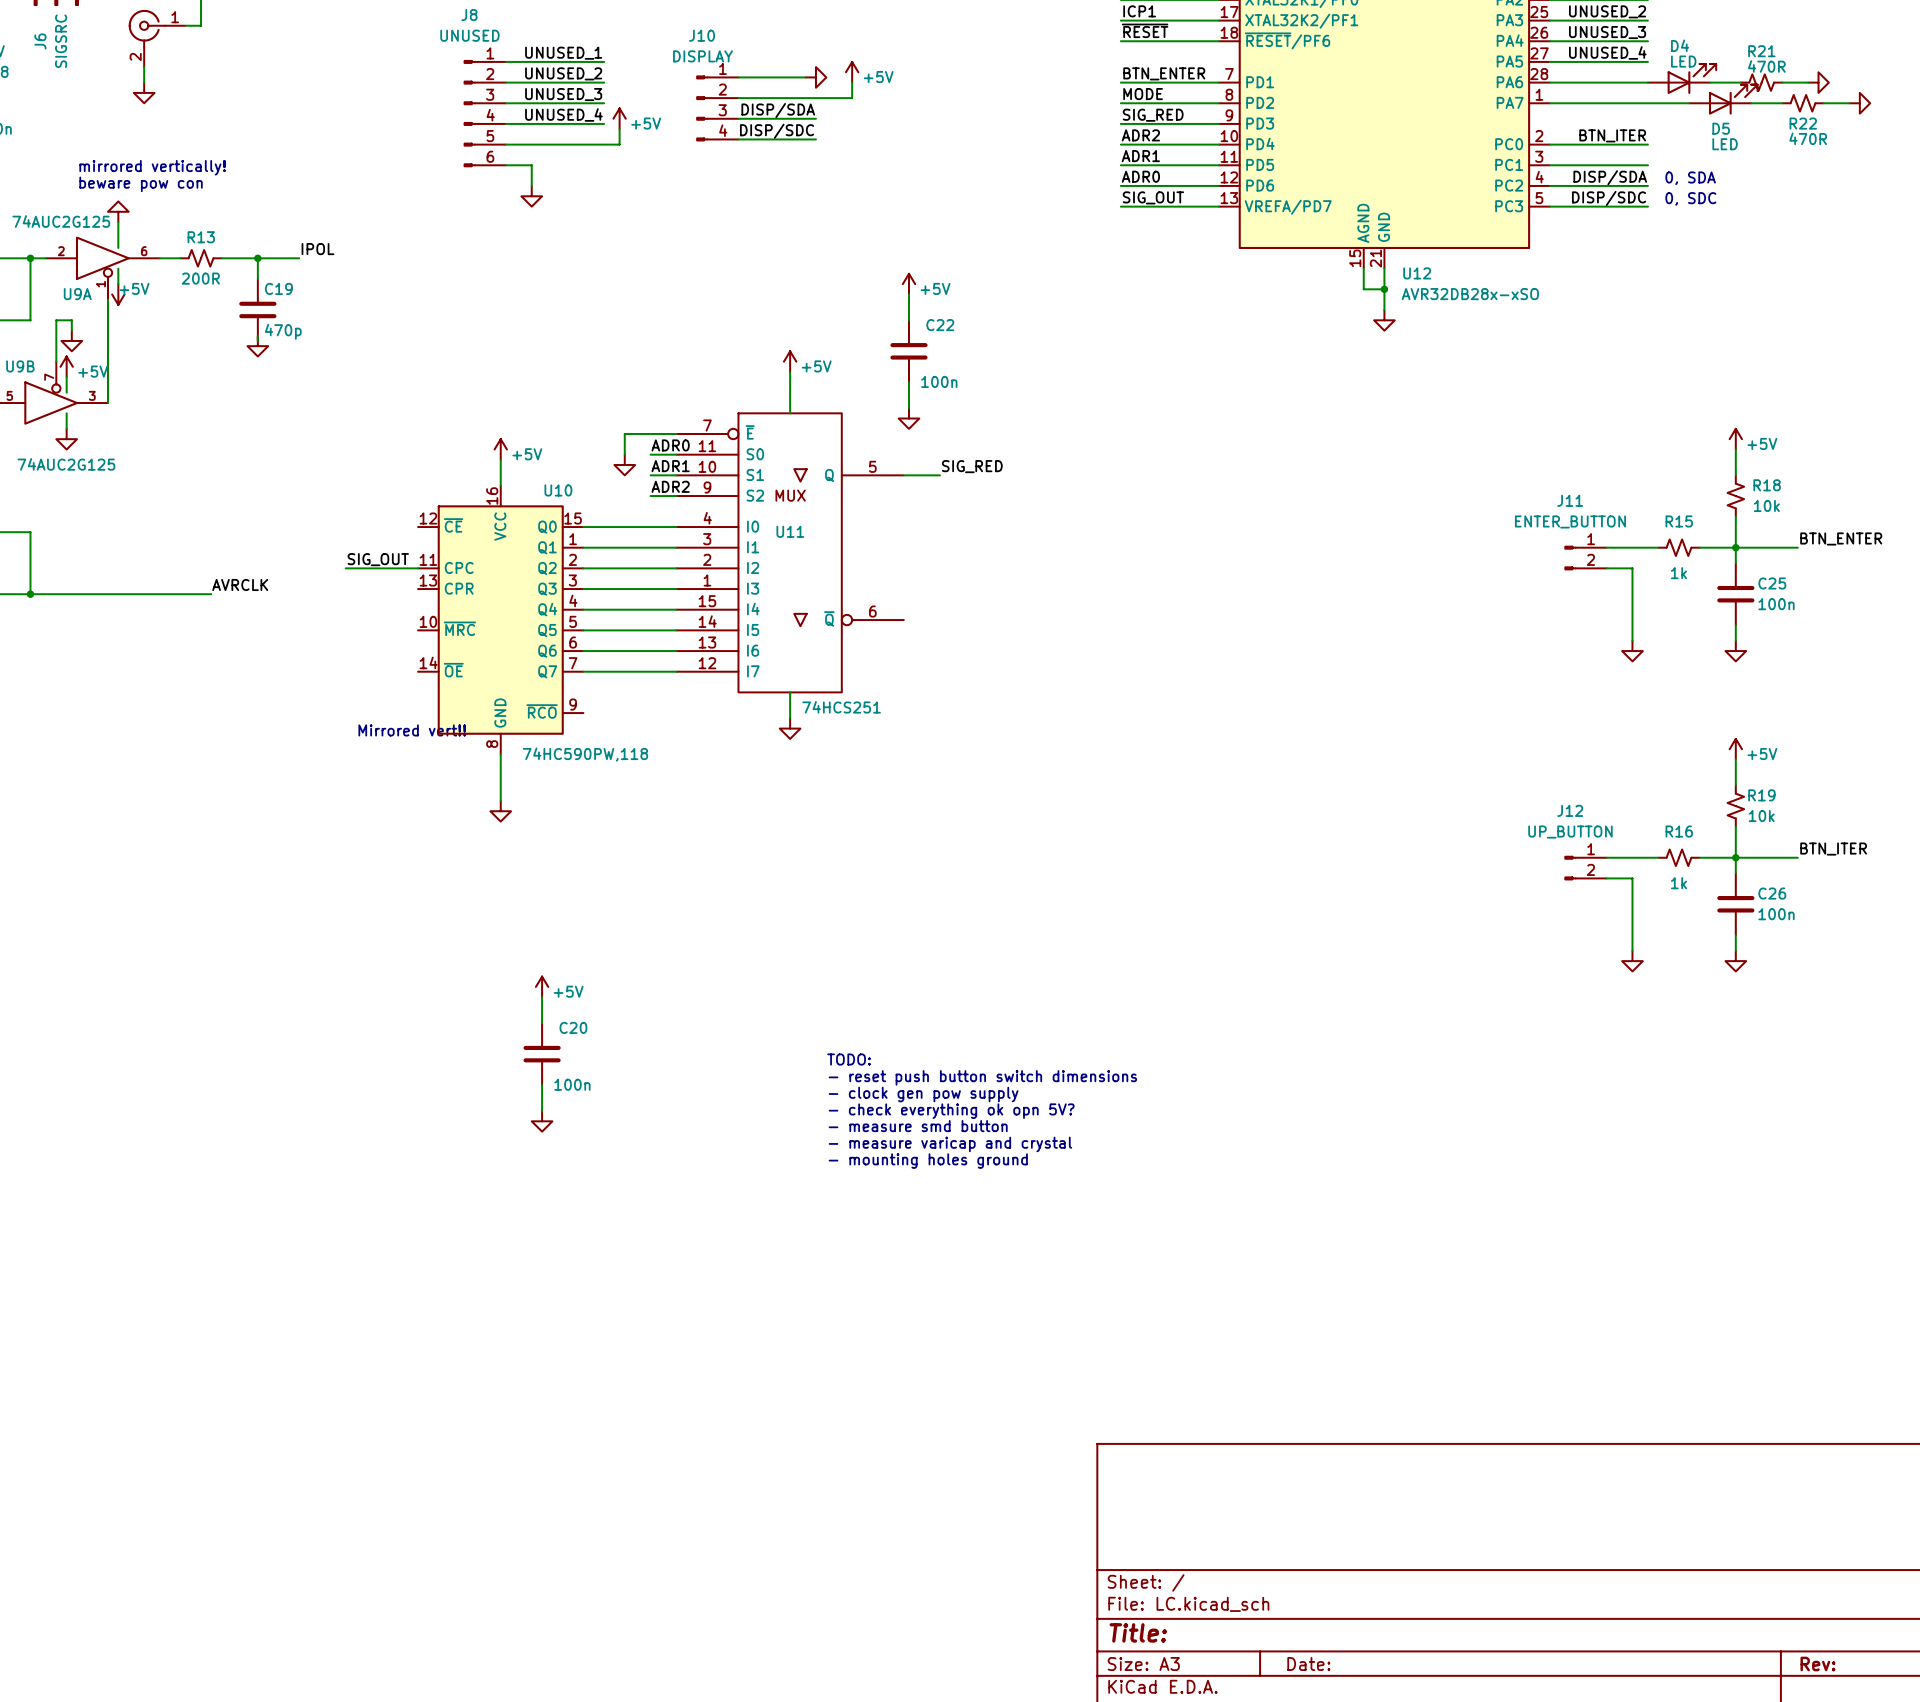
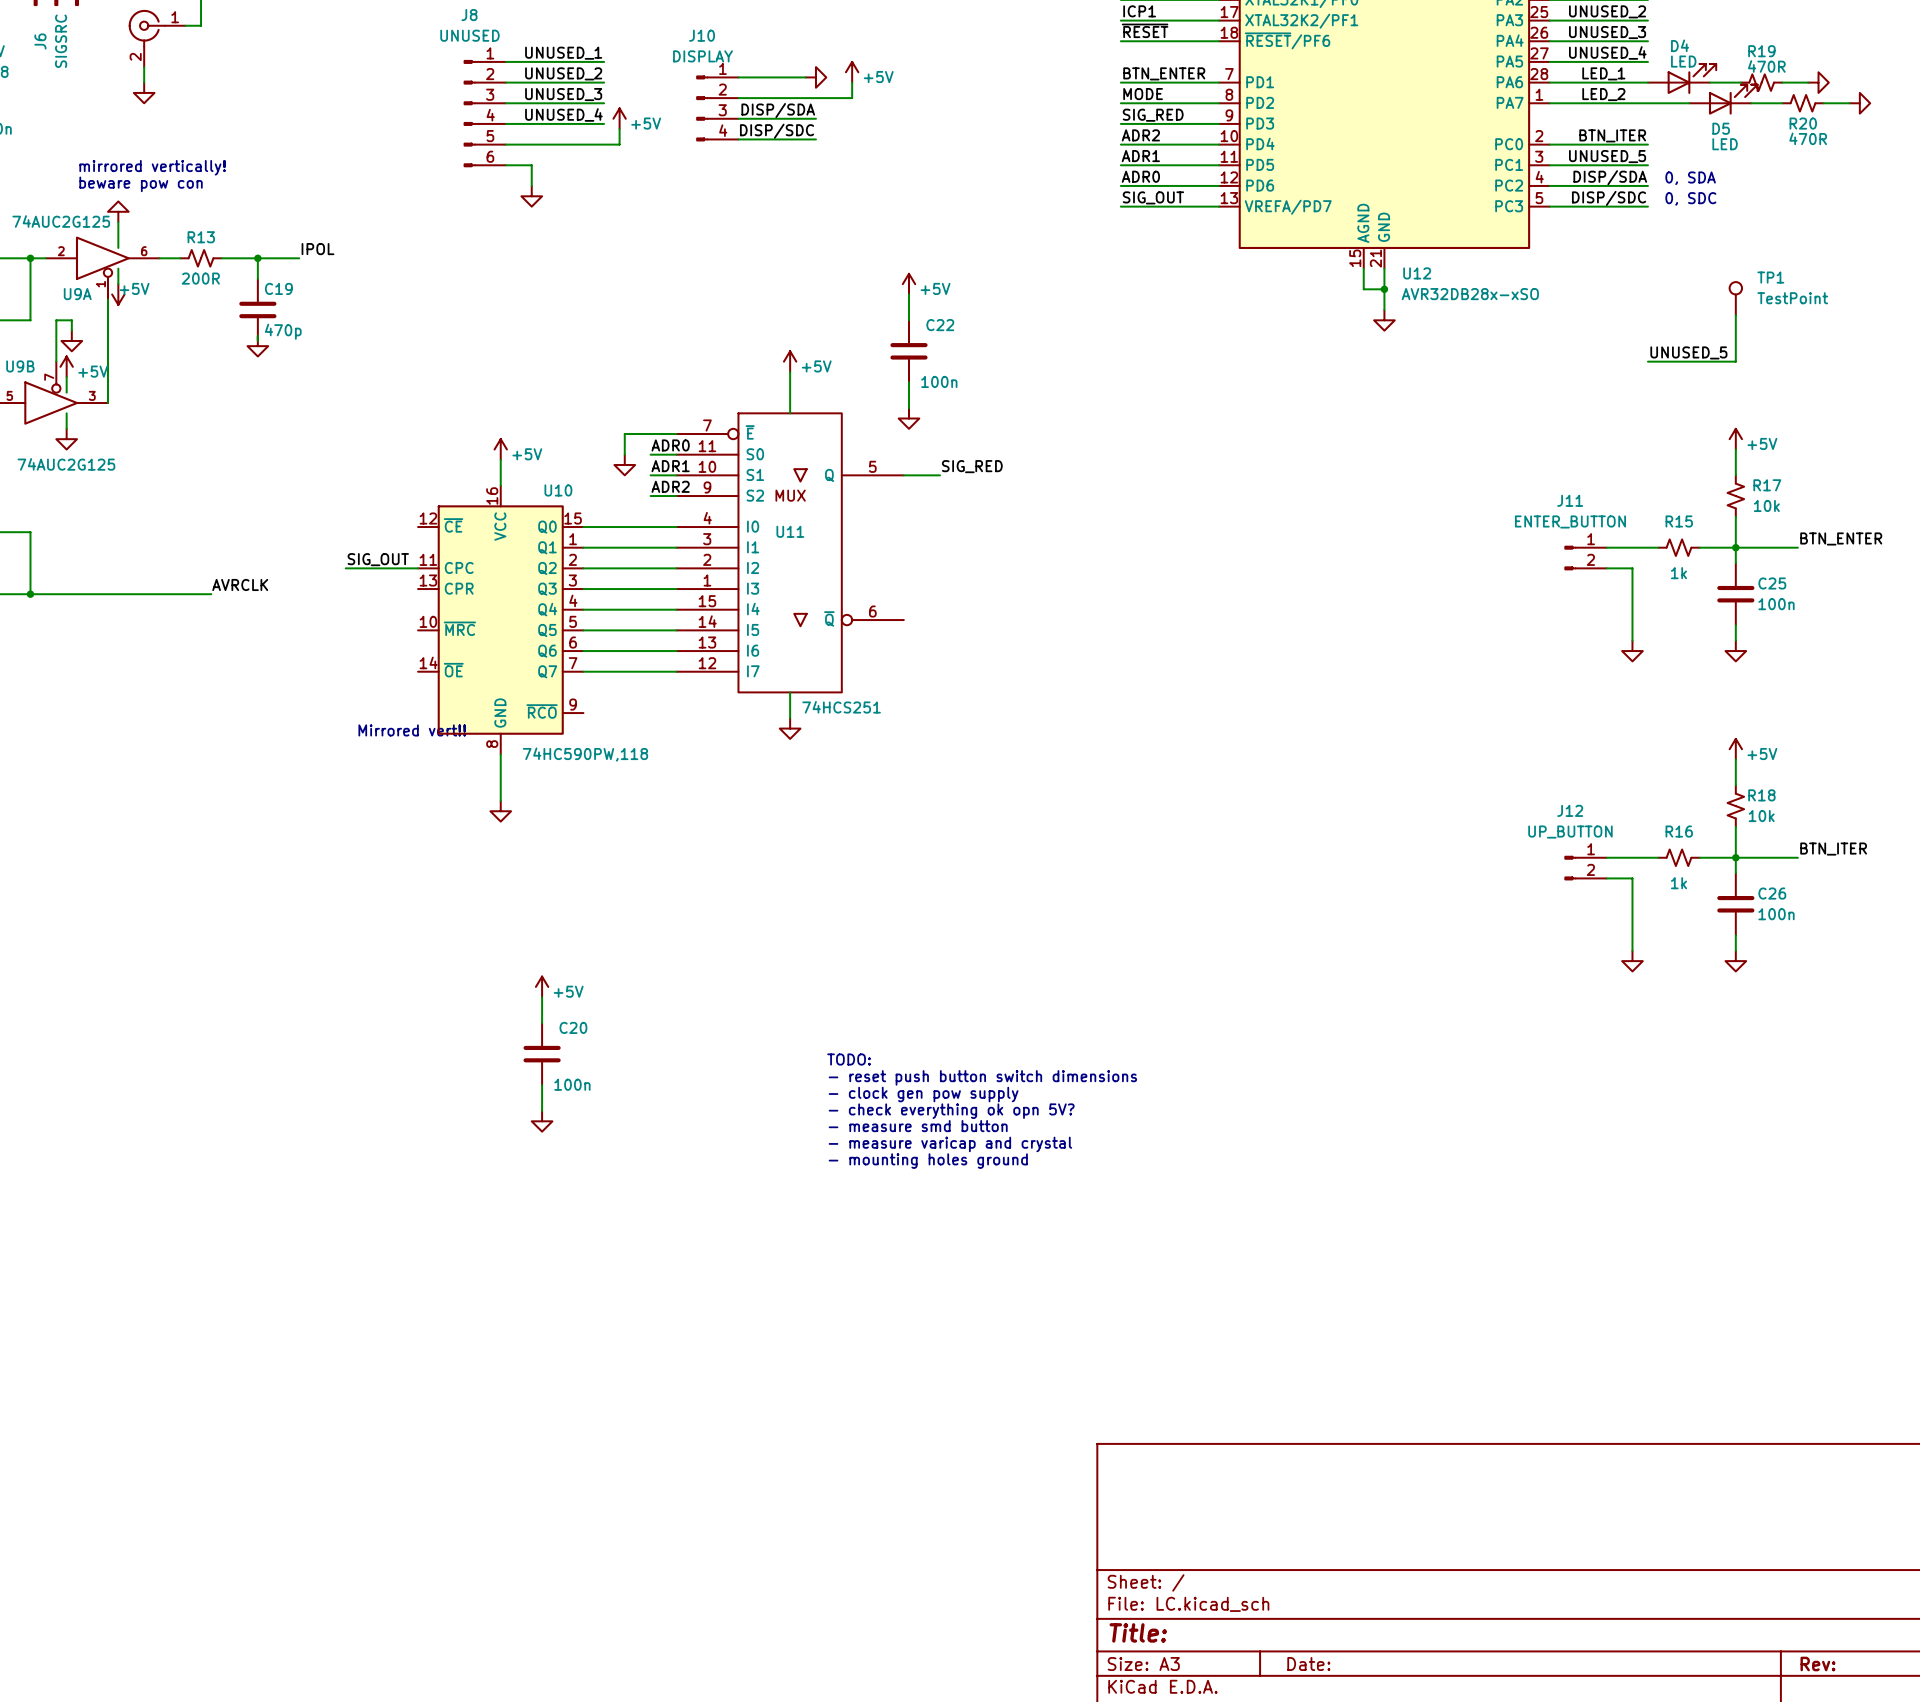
R21 name: R21 (1761, 51) -> R19 (1761, 51)
label: none -> LED_1 (1603, 73)
label: none -> LED_2 (1603, 94)
R22 name: R22 (1803, 123) -> R20 (1803, 123)
label: none -> UNUSED_5 (1607, 156)
TP1: none -> TestPoint (1735, 298)
wire: none -> (1735, 315) (1735, 361) (1647, 361)
label: none -> UNUSED_5 (1688, 352)
R18 name: R18 (1767, 485) -> R17 (1767, 485)
R19 name: R19 (1761, 795) -> R18 (1761, 795)

